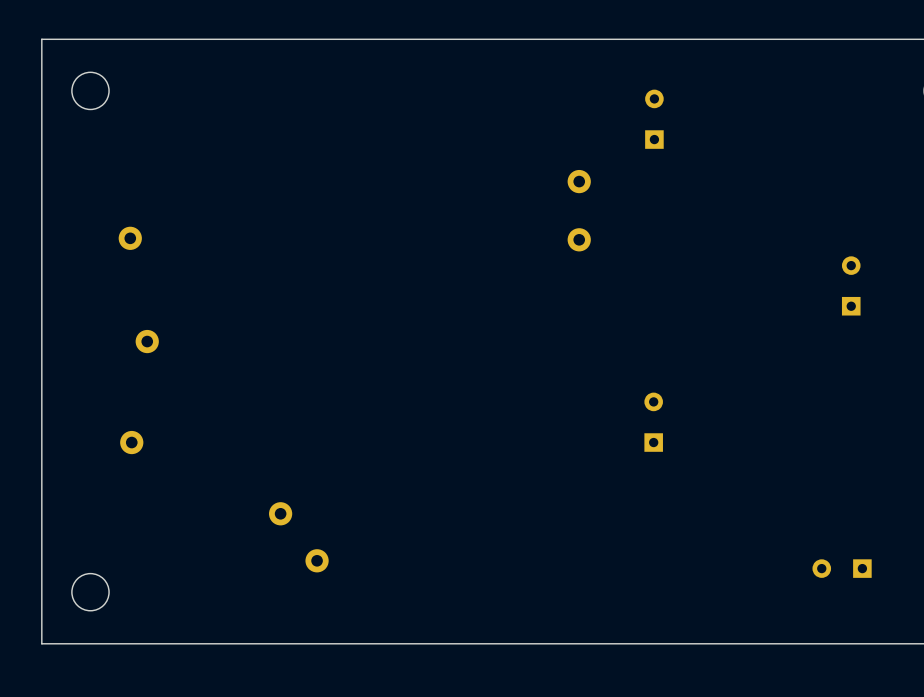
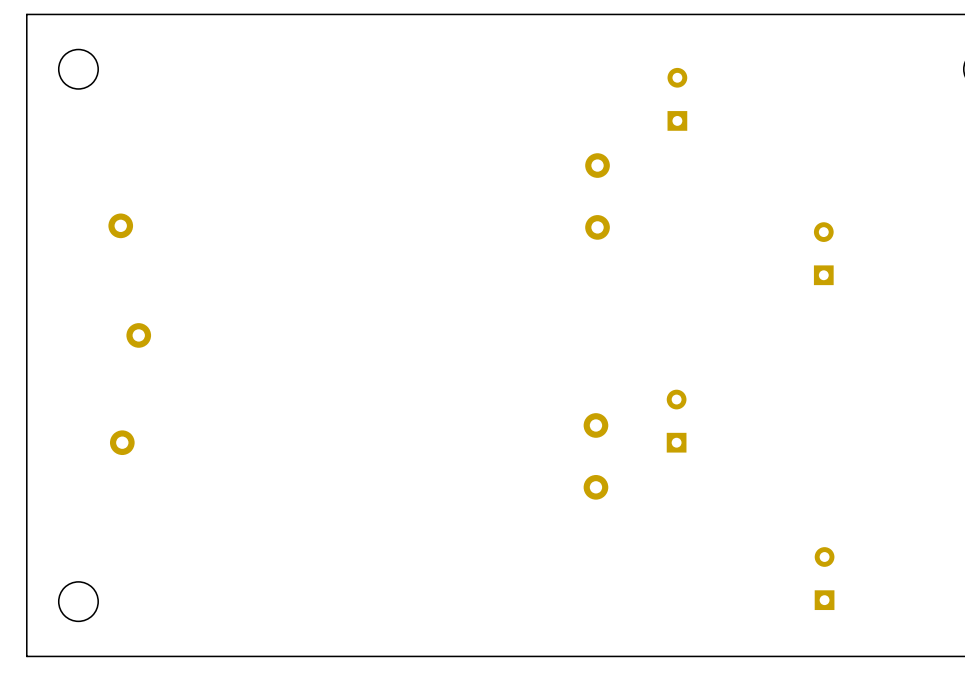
part position: (851, 285) -> (823, 253)
part: none -> (595, 425)
part: none -> (595, 487)
part: (280, 513) -> none
part: (317, 560) -> none
part rotation: 0° (842, 568) -> 90° clockwise (824, 578)
part position: (842, 568) -> (824, 578)

